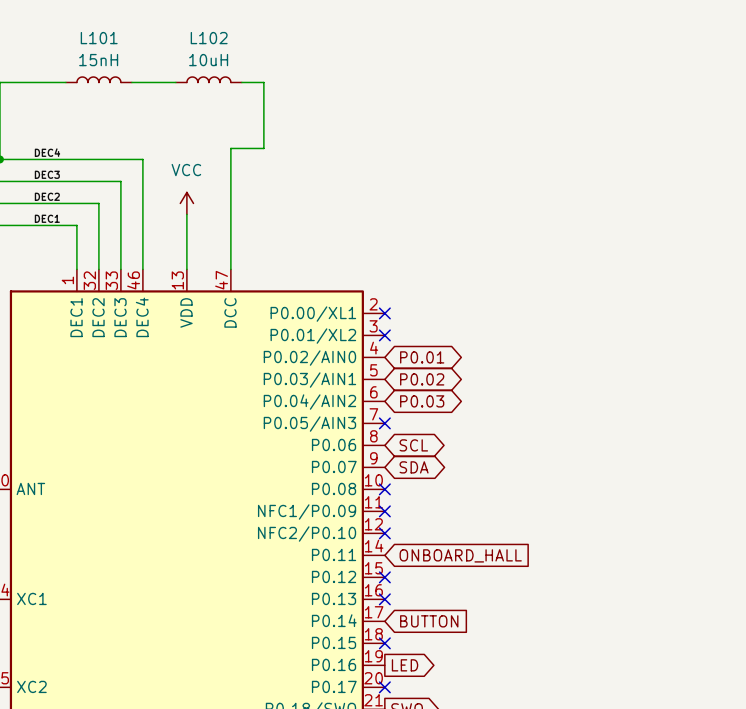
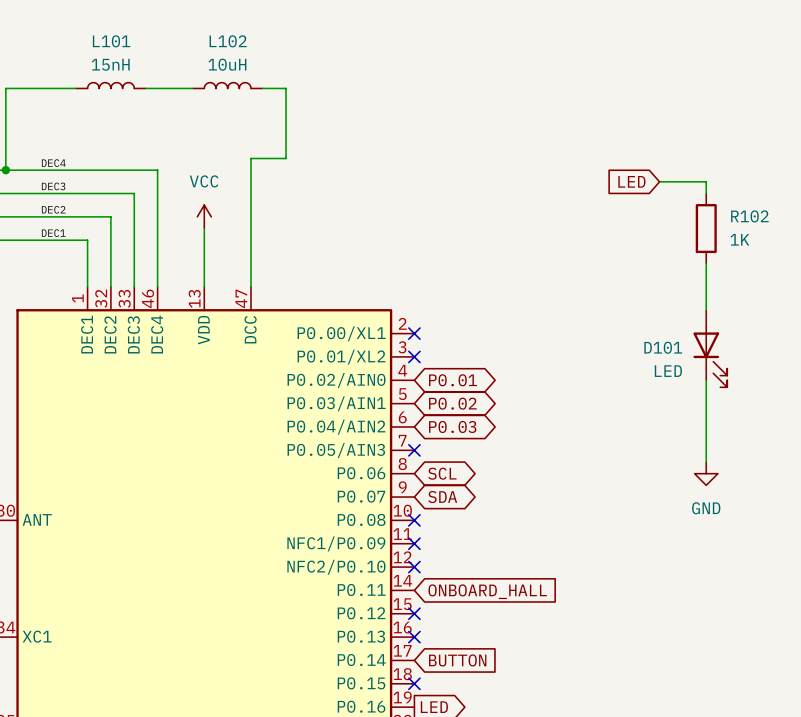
global label: none -> LED (631, 181)
wire: none -> (659, 181) (706, 181) (706, 193)
R102: none -> 1K (706, 228)
wire: none -> (706, 263) (706, 310)
D101: none -> LED (710, 348)
wire: none -> (706, 380) (706, 462)
power symbol: none -> GND (706, 473)

